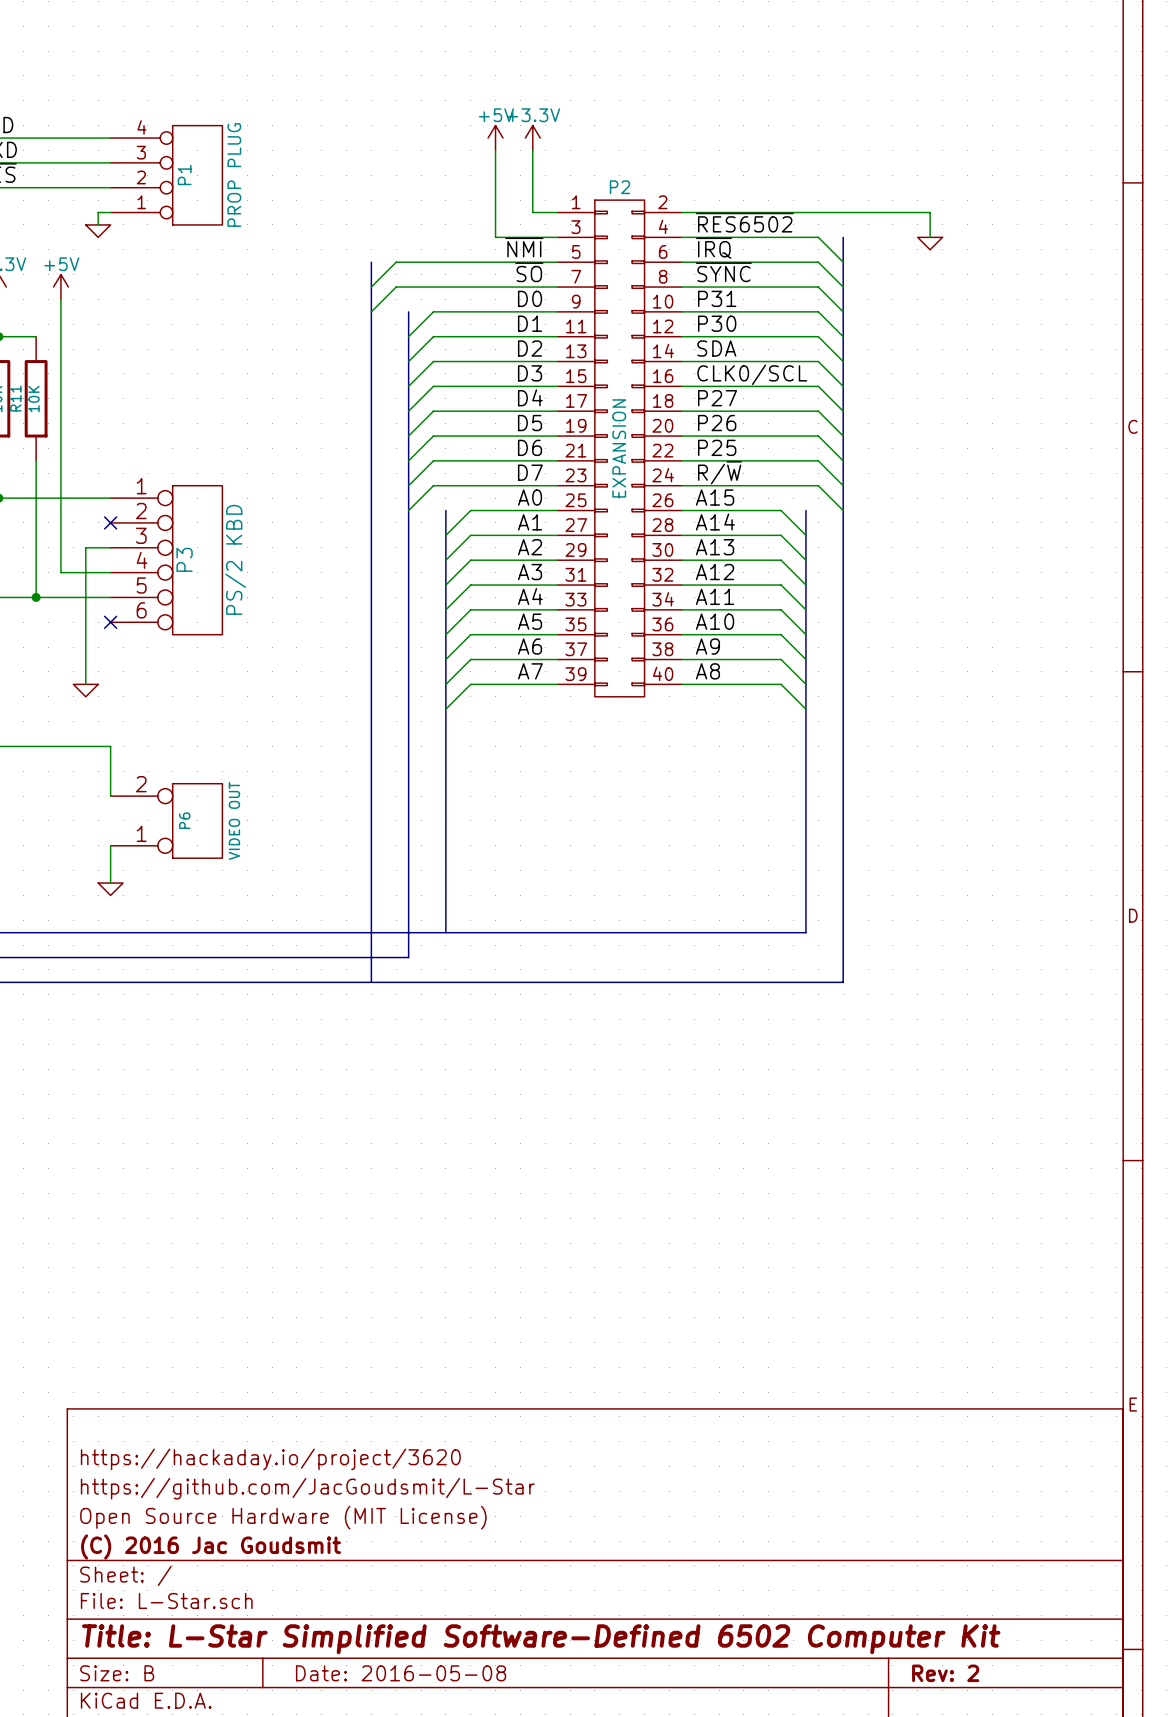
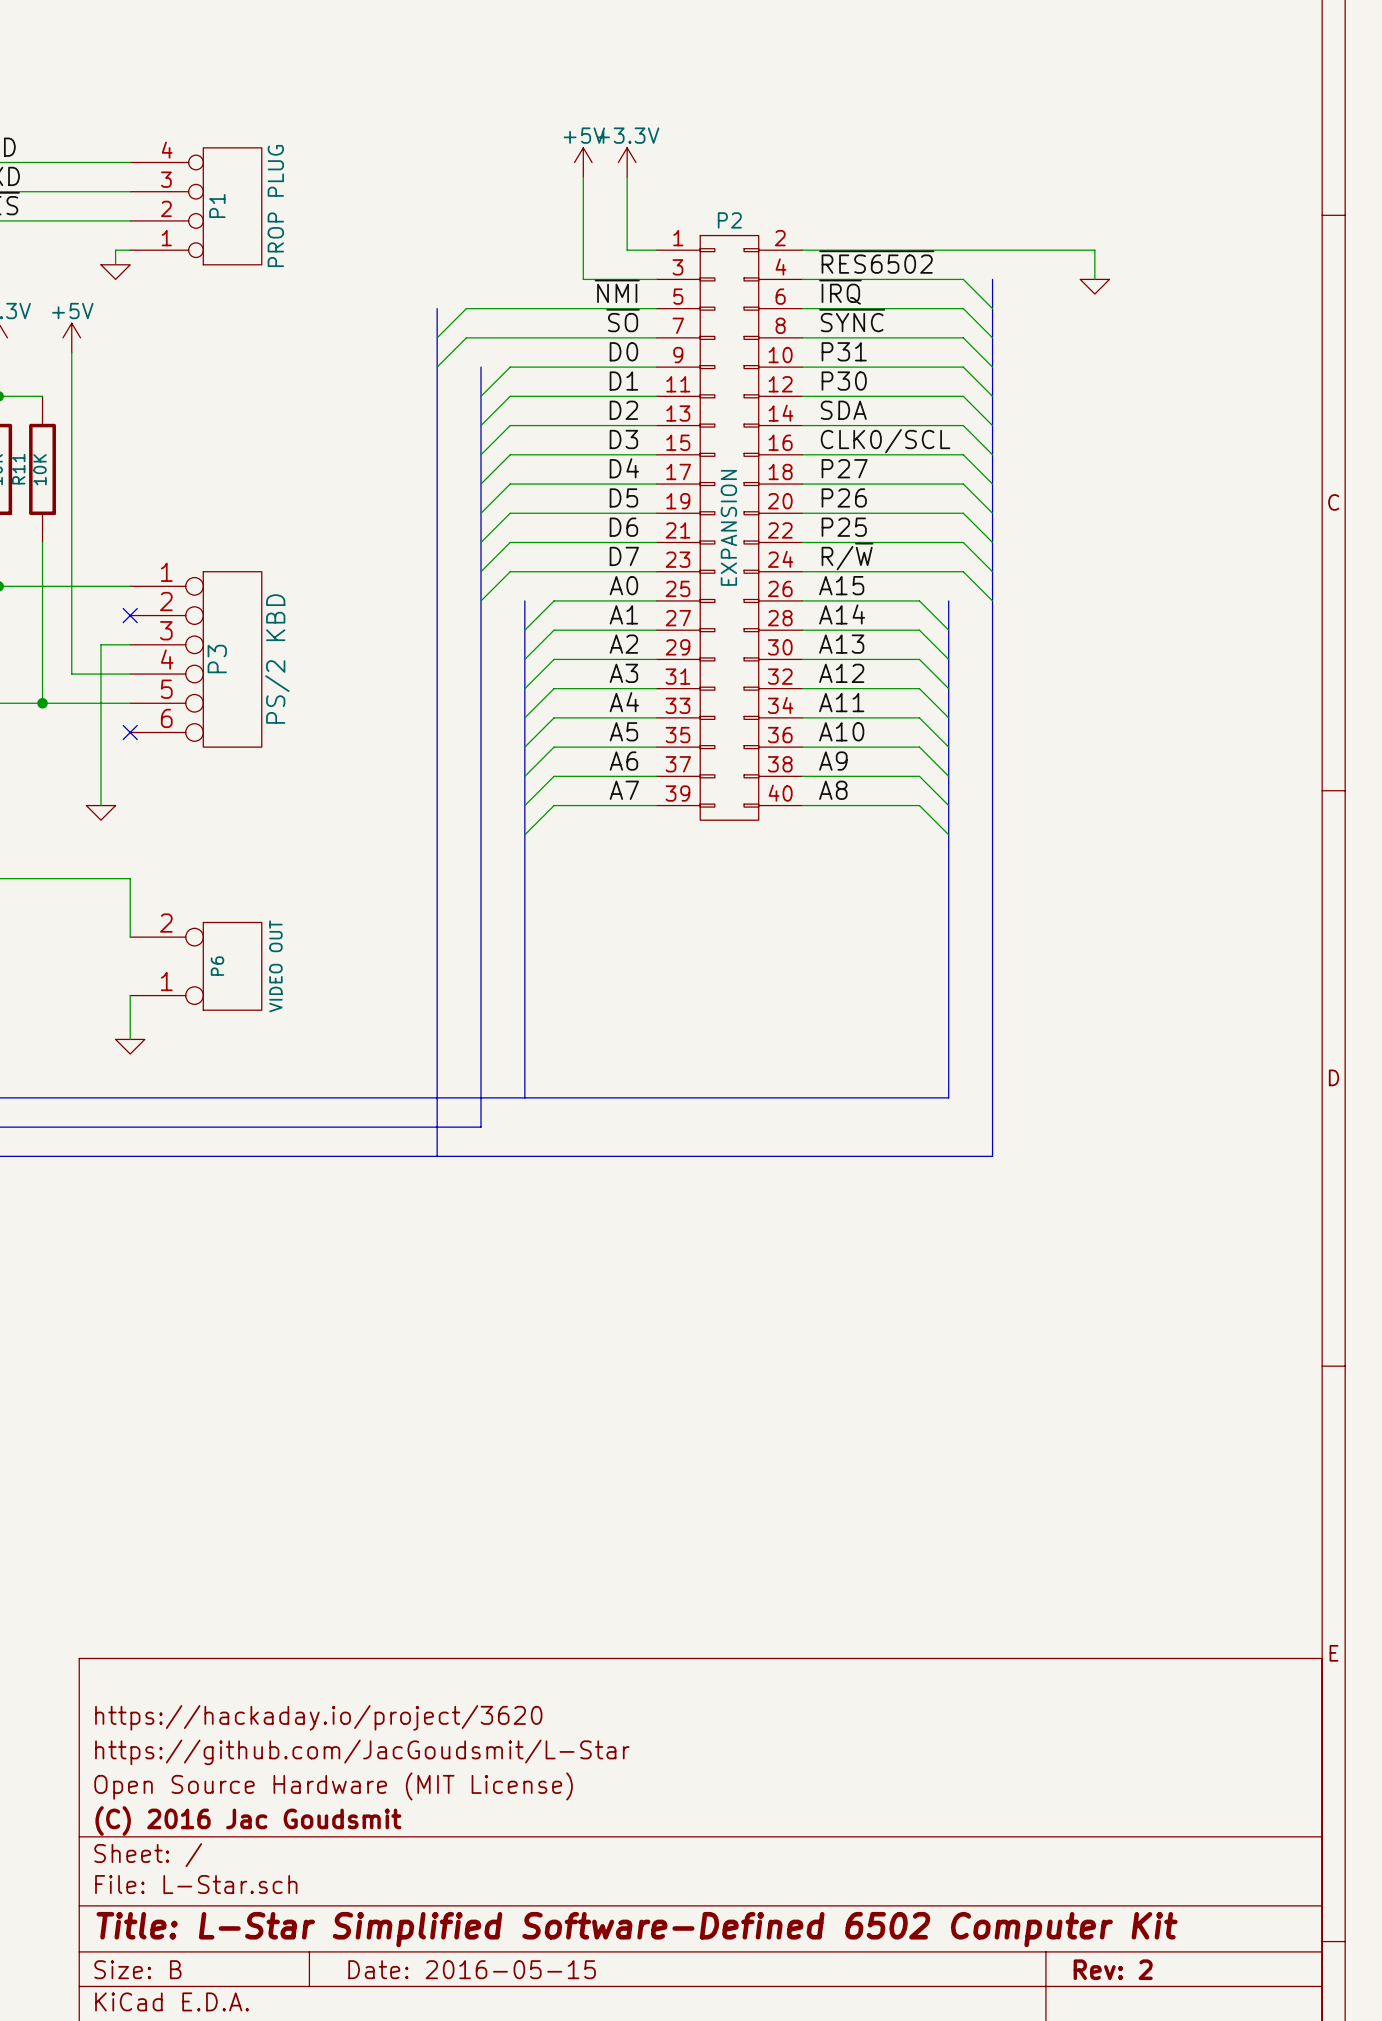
title block: Date: 2016-05-08 (401, 1673) -> Date: 2016-05-15 (472, 1969)

